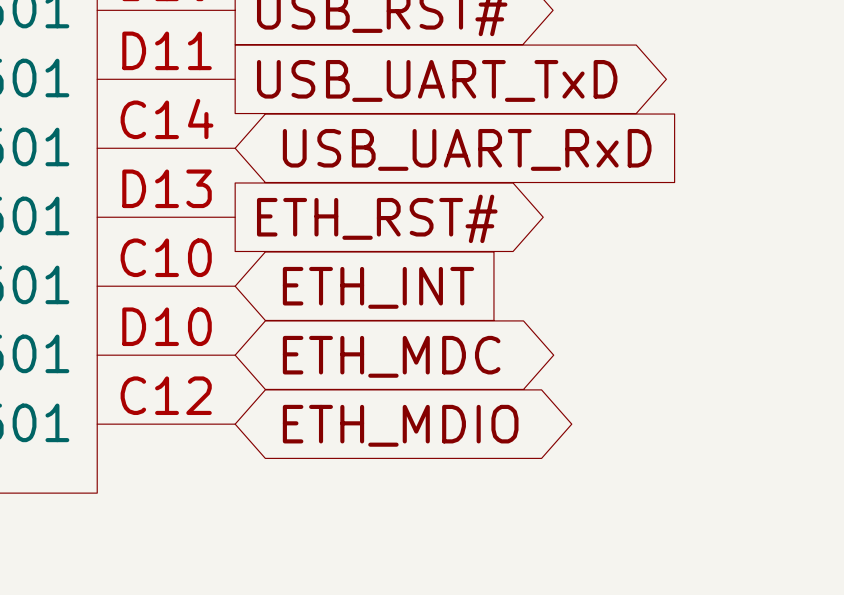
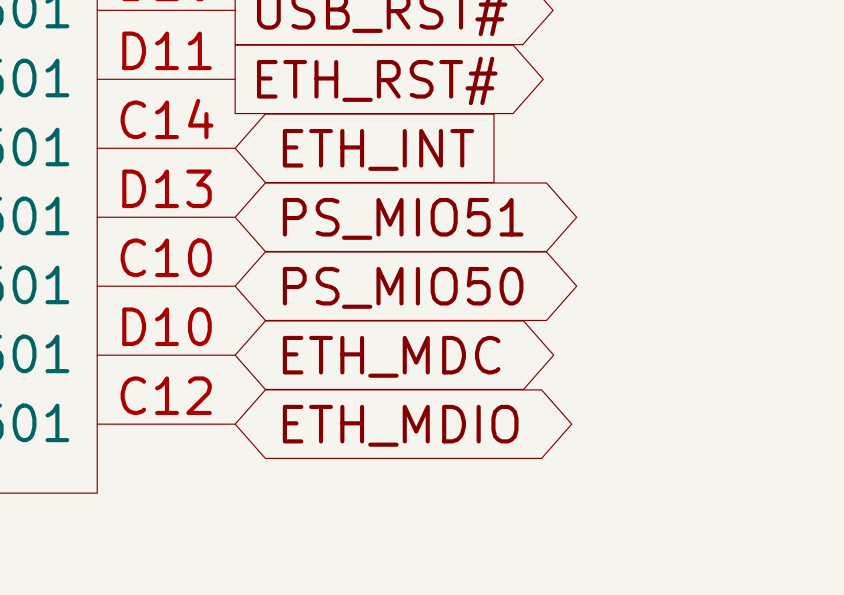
global label: USB_UART_TxD (437, 80) -> ETH_RST# (377, 80)
global label: USB_UART_RxD (467, 149) -> ETH_INT (378, 149)
global label shape: output (377, 218) -> bidirectional (403, 218)
global label: ETH_RST# (377, 218) -> PS_MIO51 (403, 218)
global label shape: input (378, 287) -> bidirectional (403, 287)
global label: ETH_INT (378, 287) -> PS_MIO50 (403, 287)

